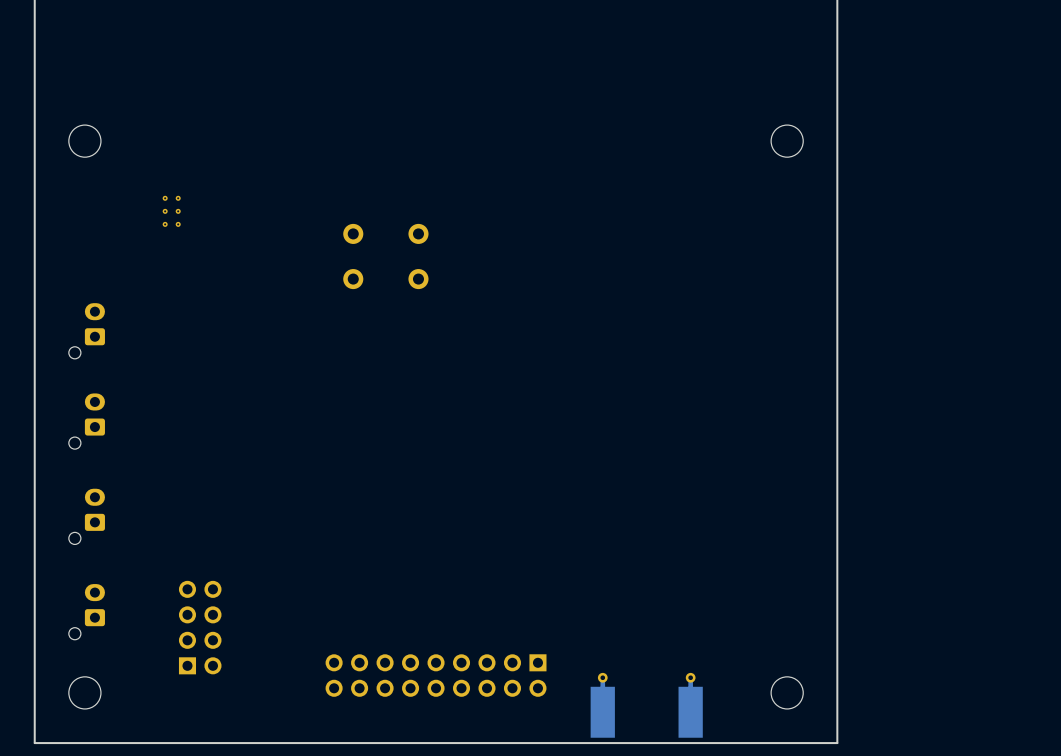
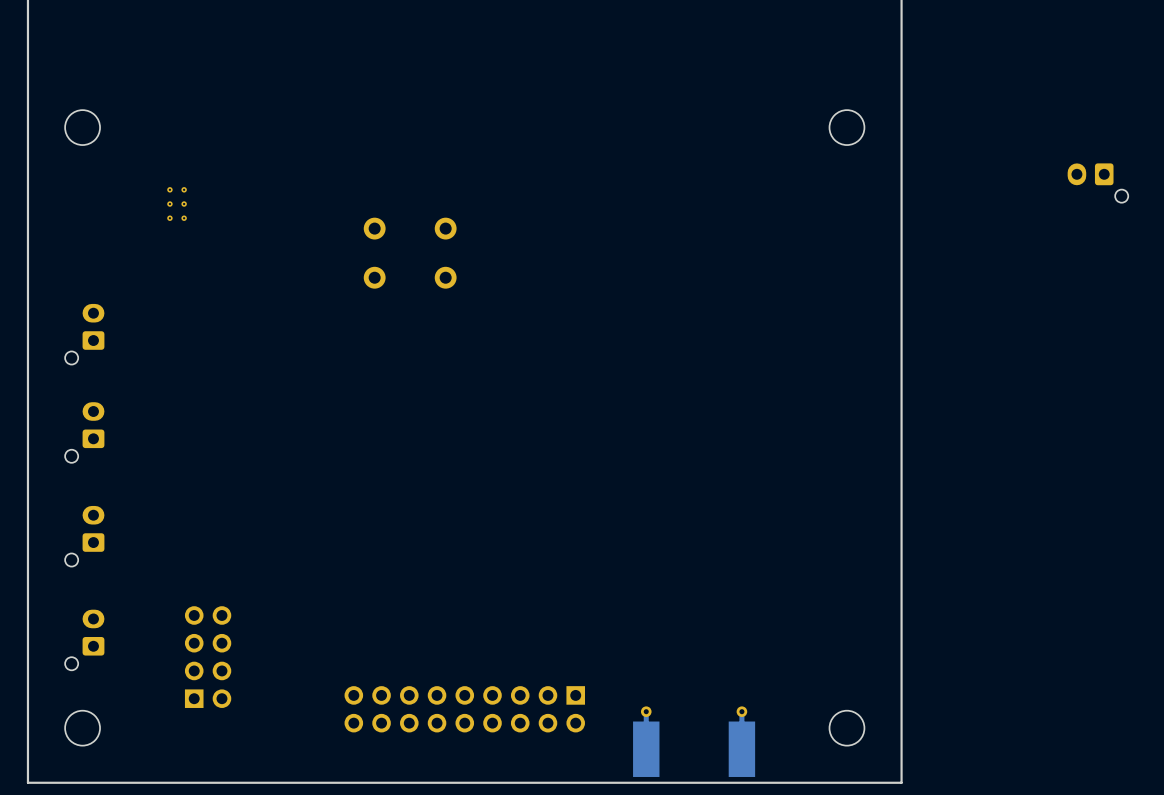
part: none -> (1097, 183)

